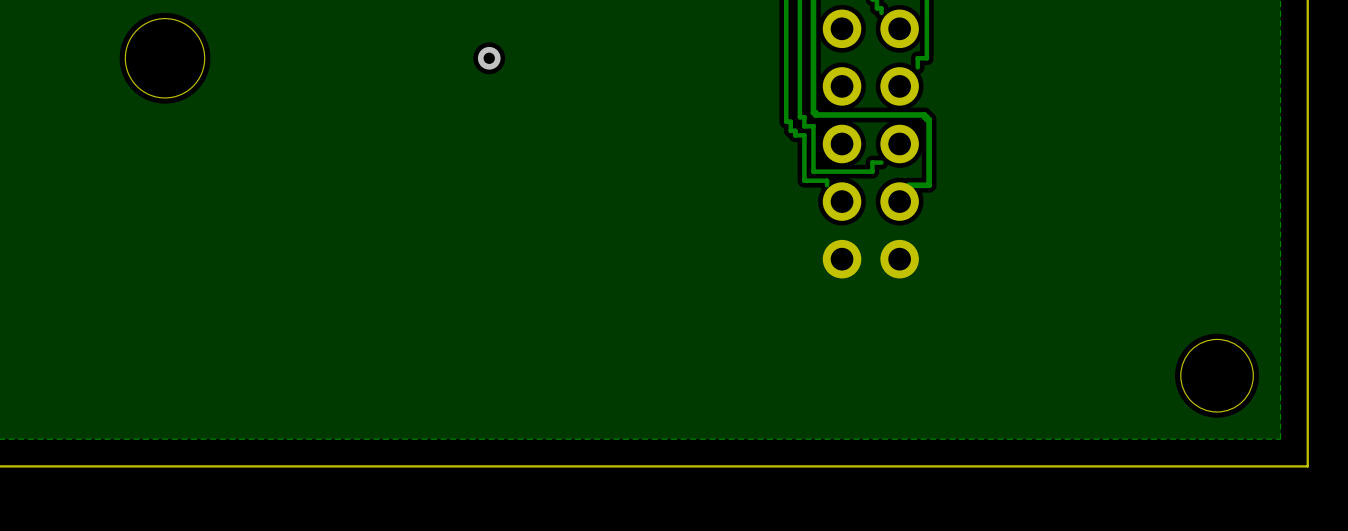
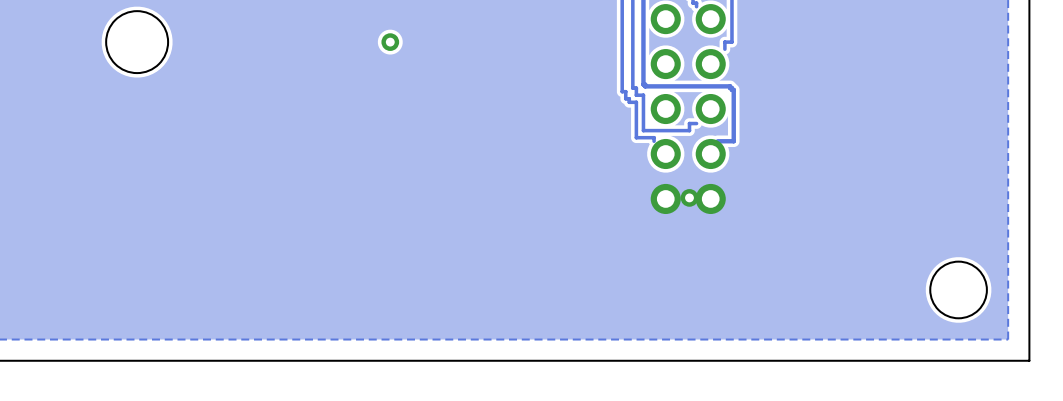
via: none -> (689, 197)

